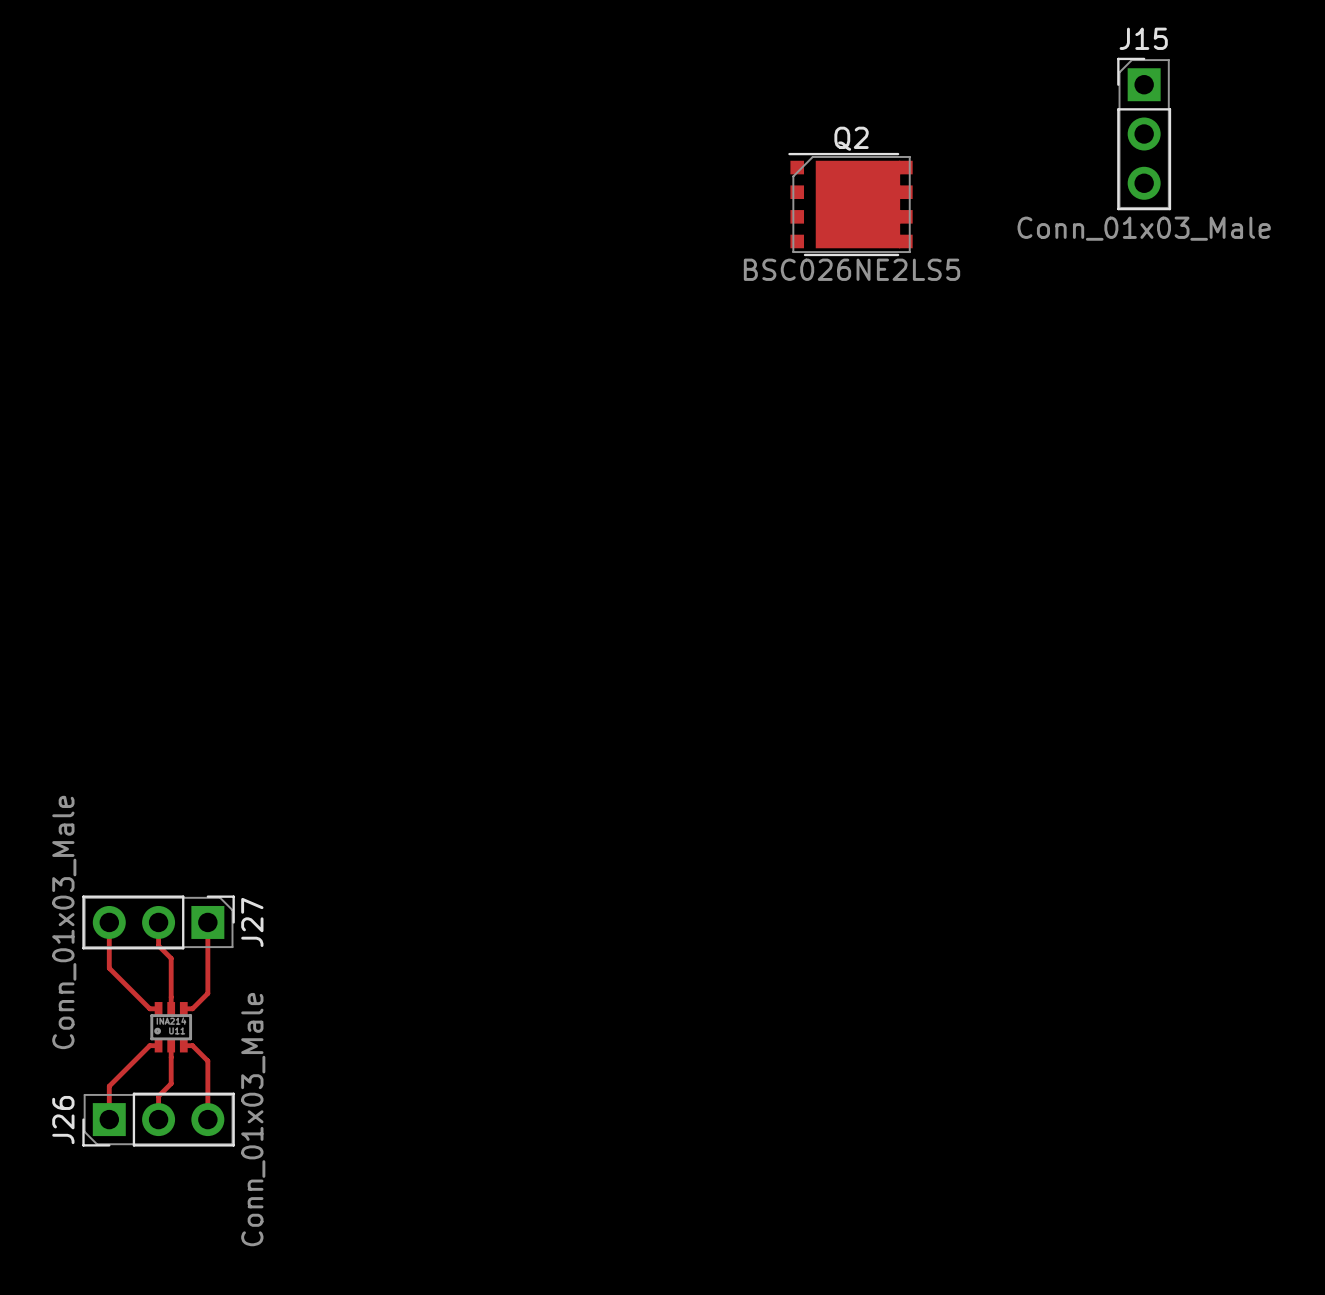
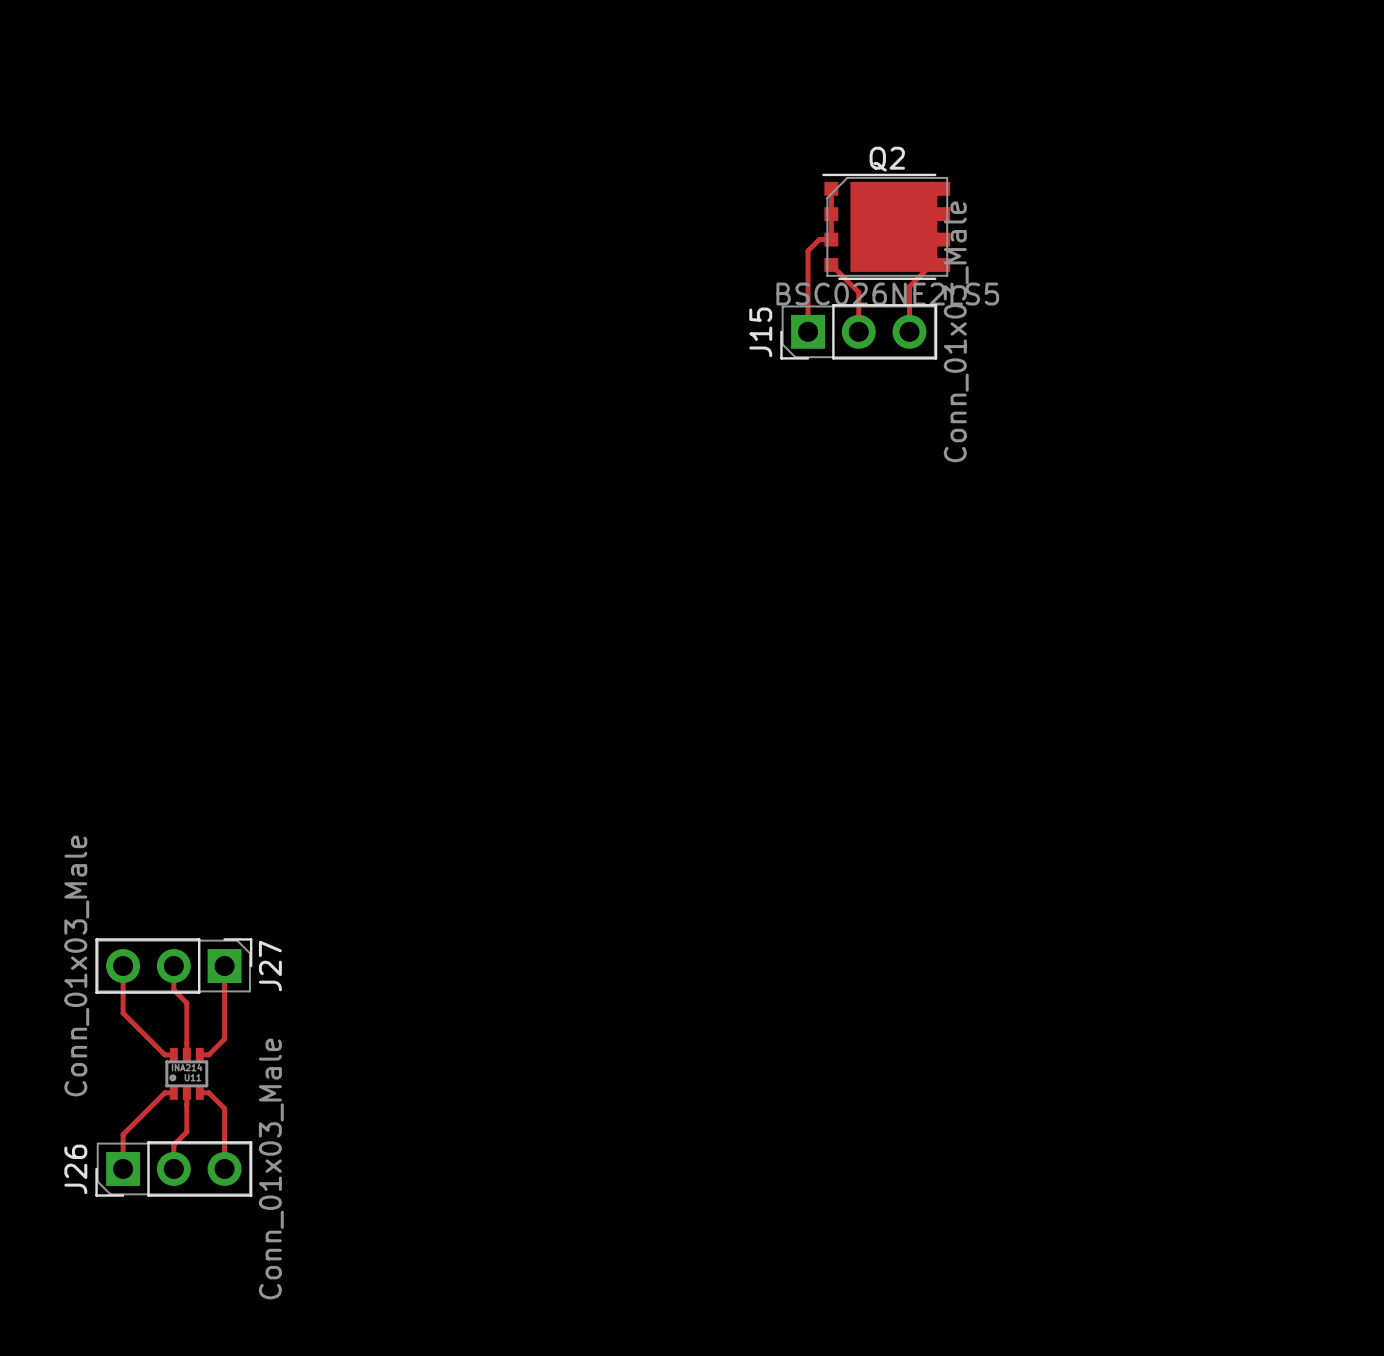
J15 rotation: 0° (1144, 134) -> 90° counterclockwise (858, 331)
J15 position: (1144, 134) -> (858, 331)
top track: none -> (831, 188) (831, 239) (819, 239) (808, 250) (808, 331)
top track: none -> (831, 264) (858, 292) (858, 331)
top track: none -> (943, 264) (931, 264) (909, 286) (909, 331)

